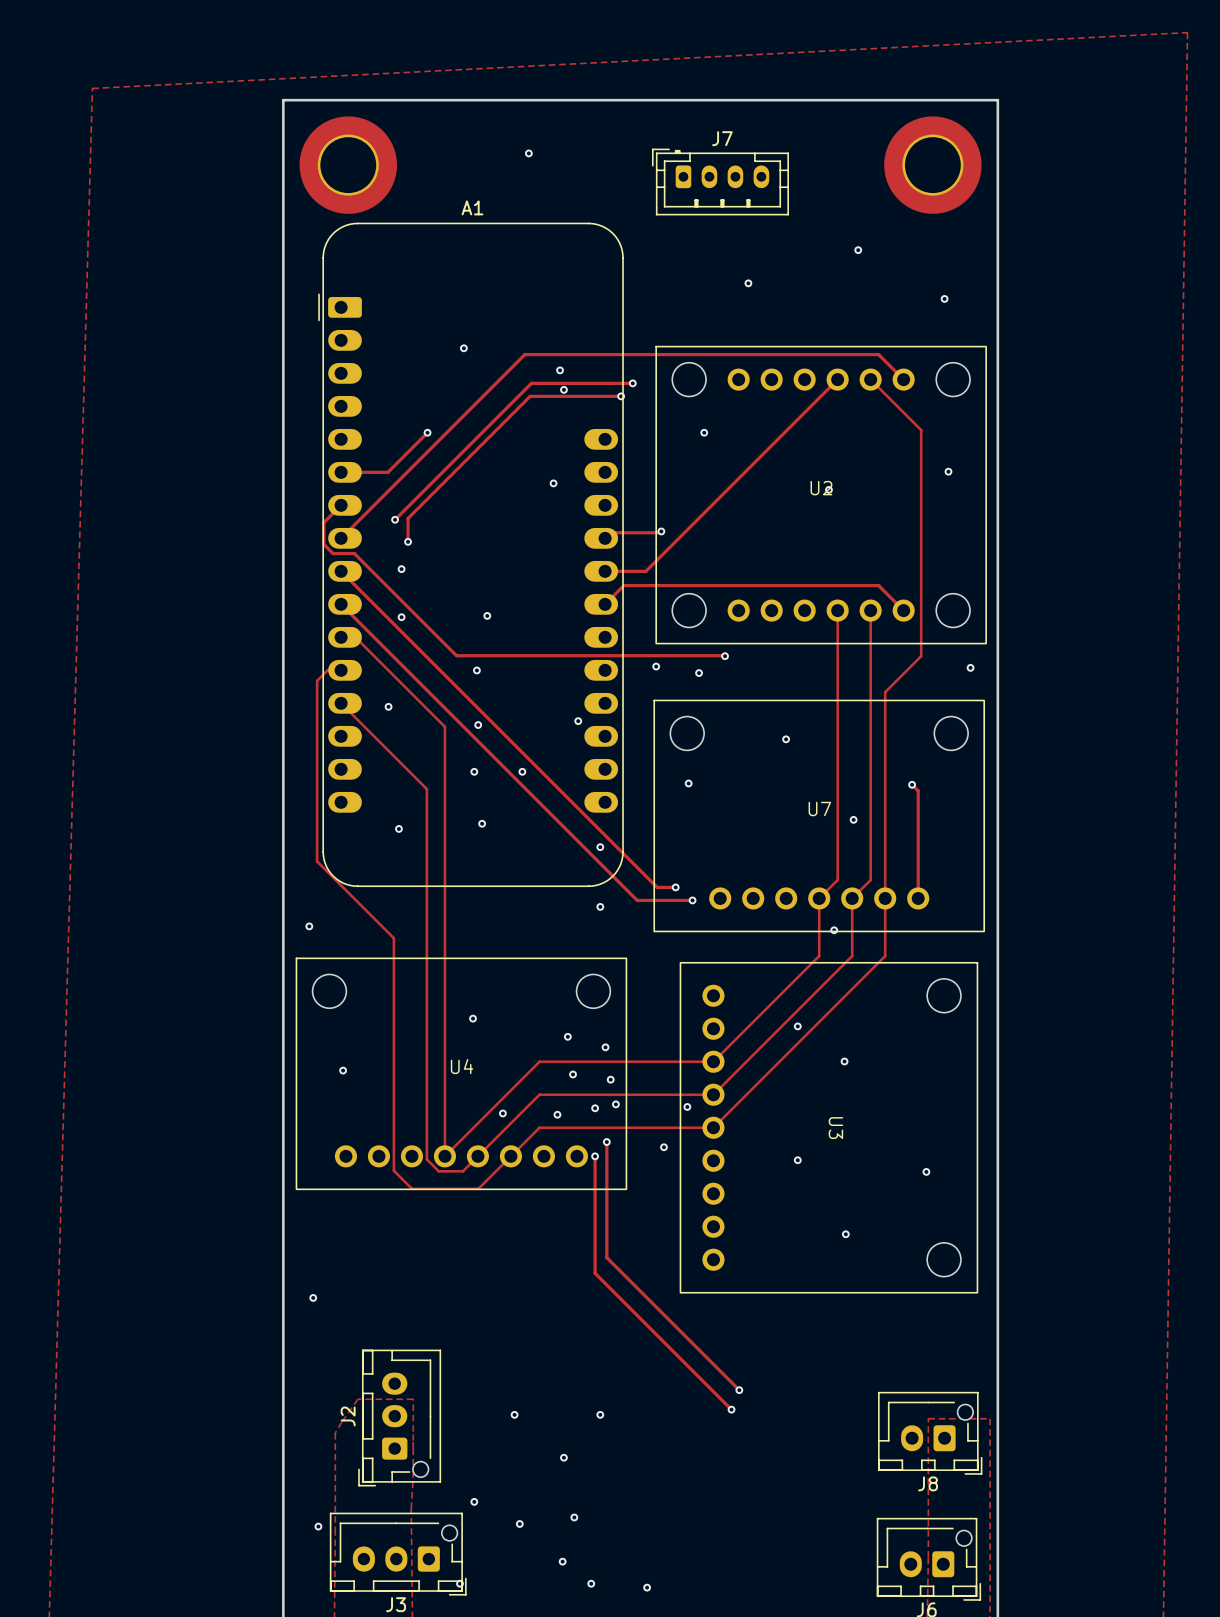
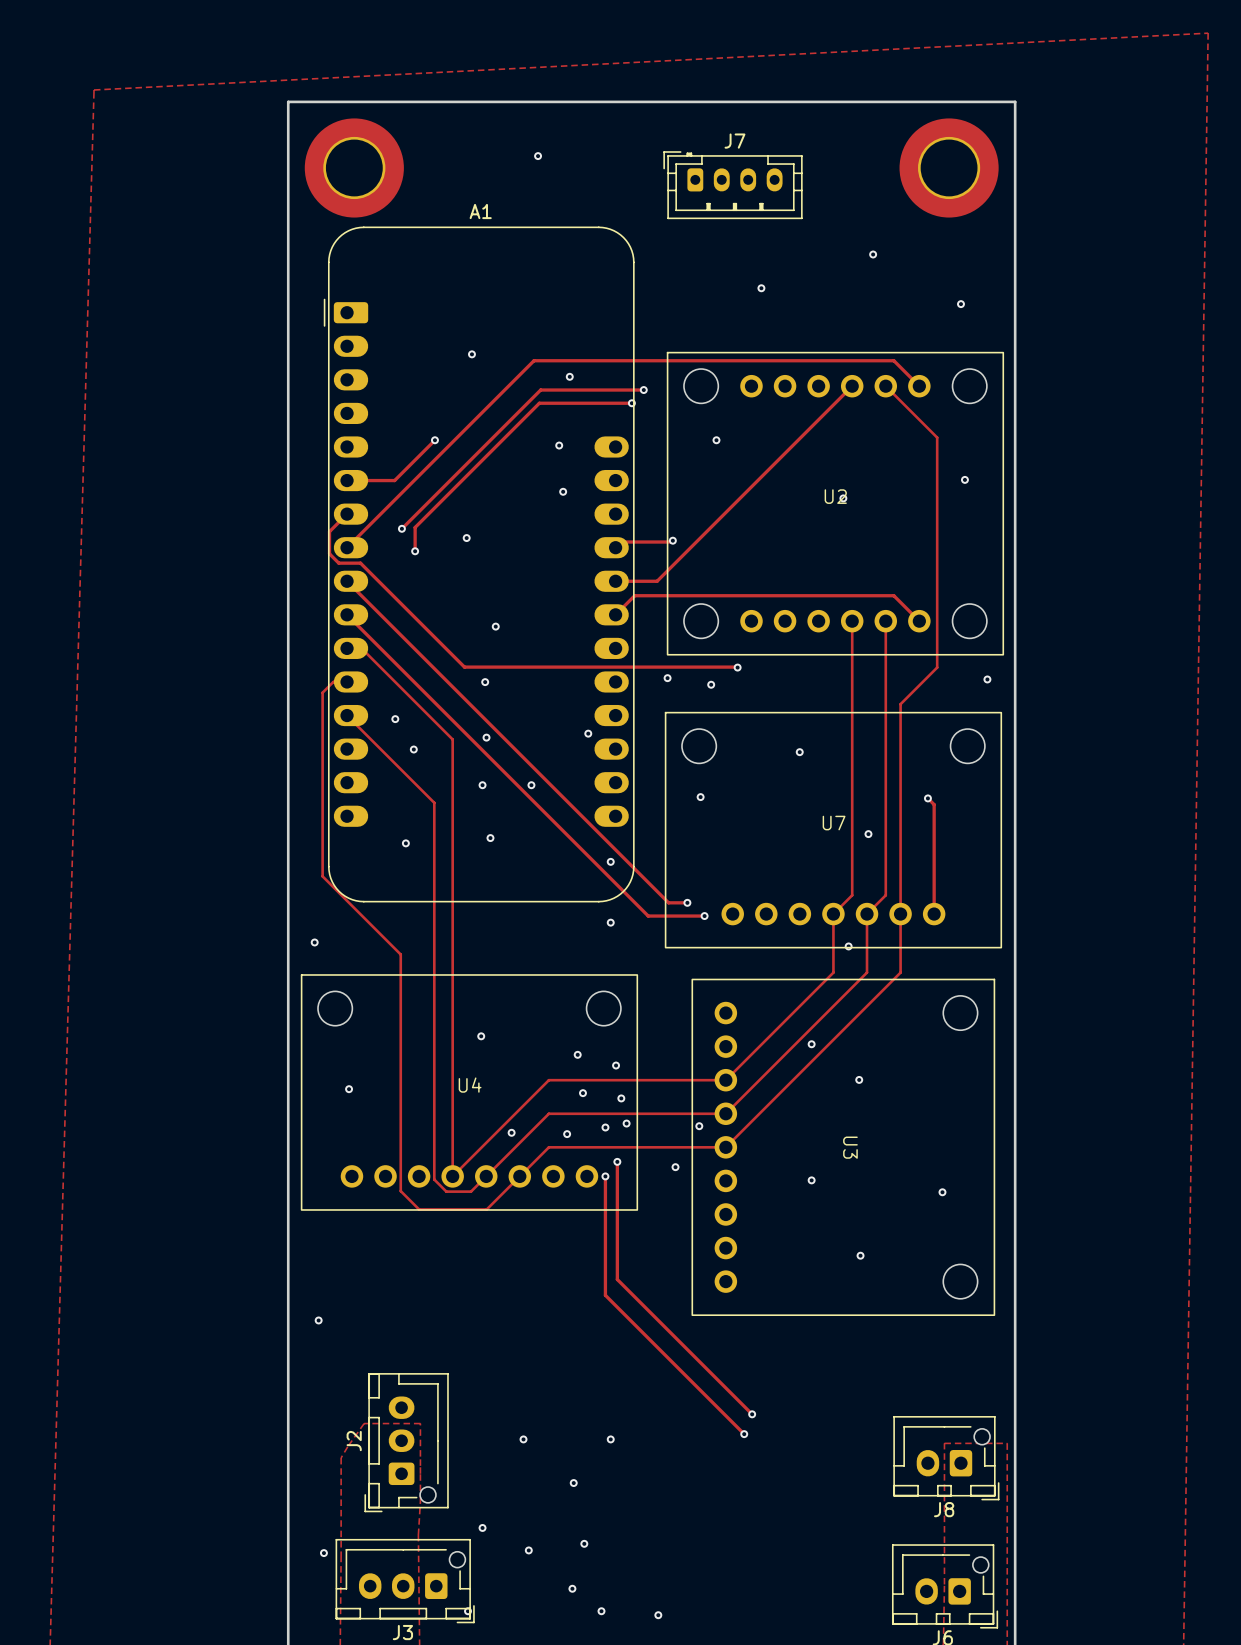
via position: (563, 389) -> (559, 445)
via: none -> (466, 538)
via: (401, 569) -> none
via: (401, 617) -> none
via: none -> (413, 749)

